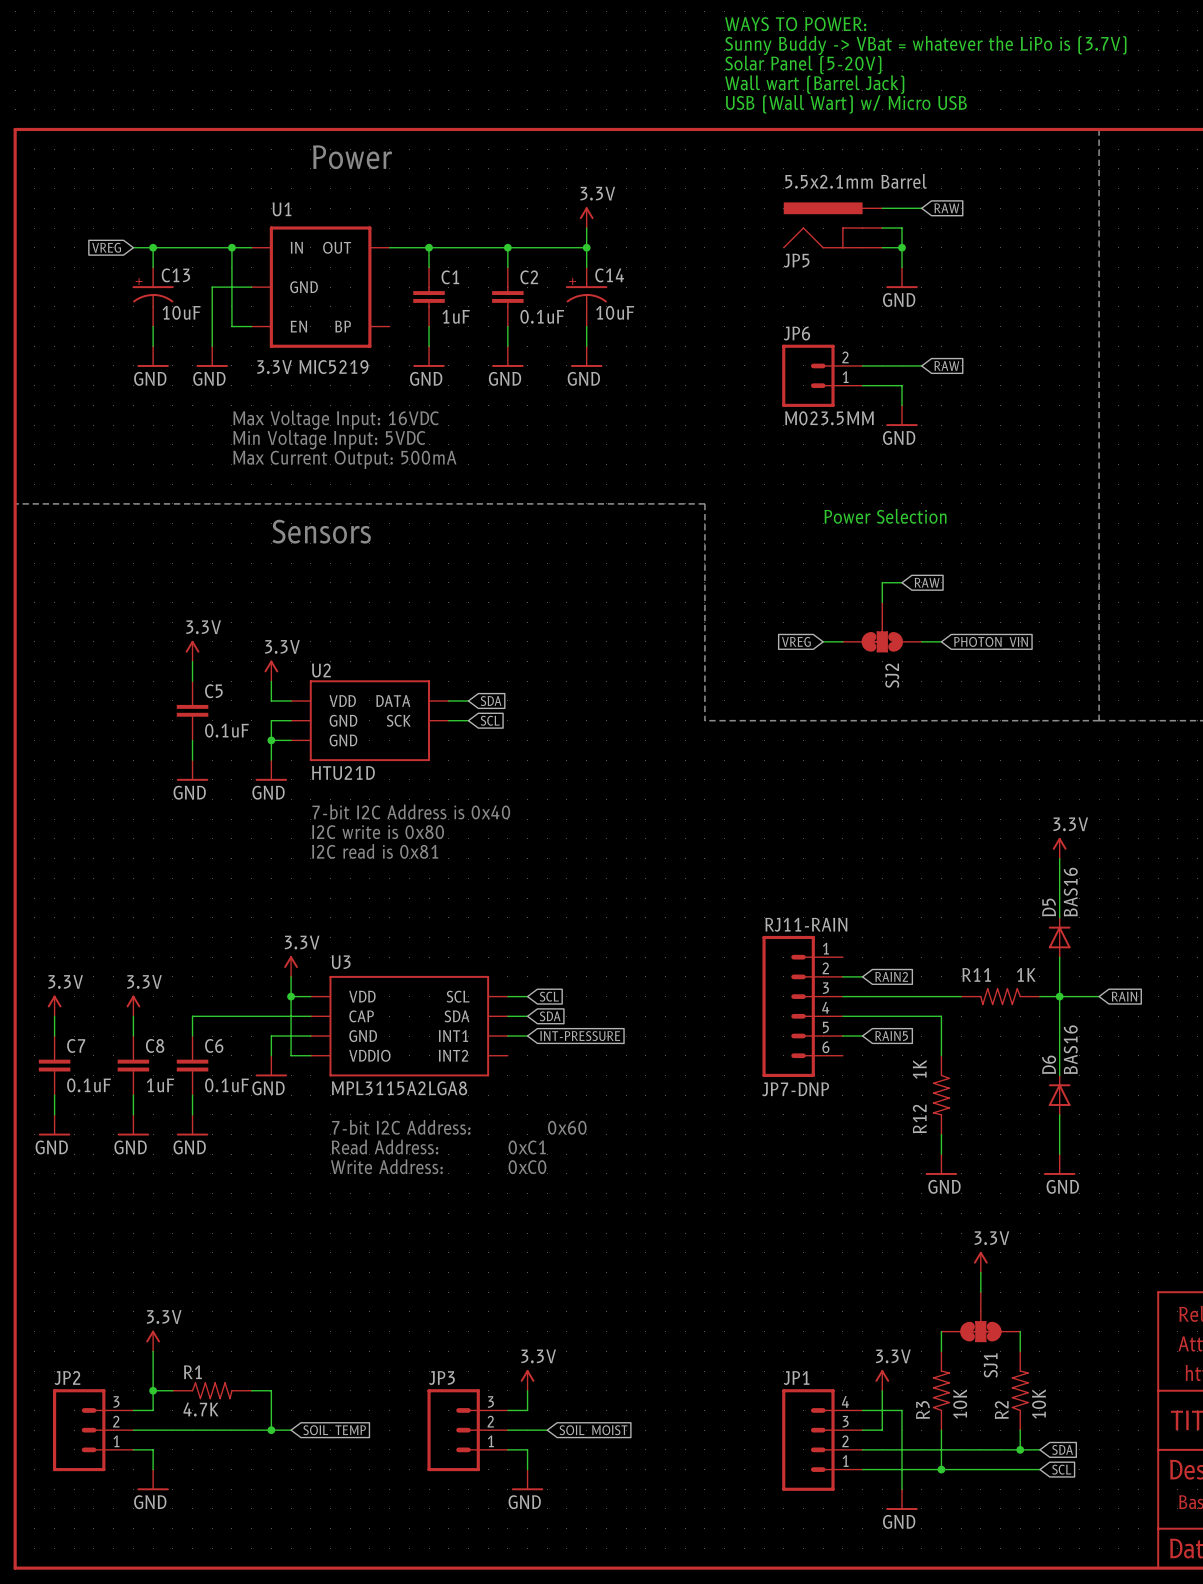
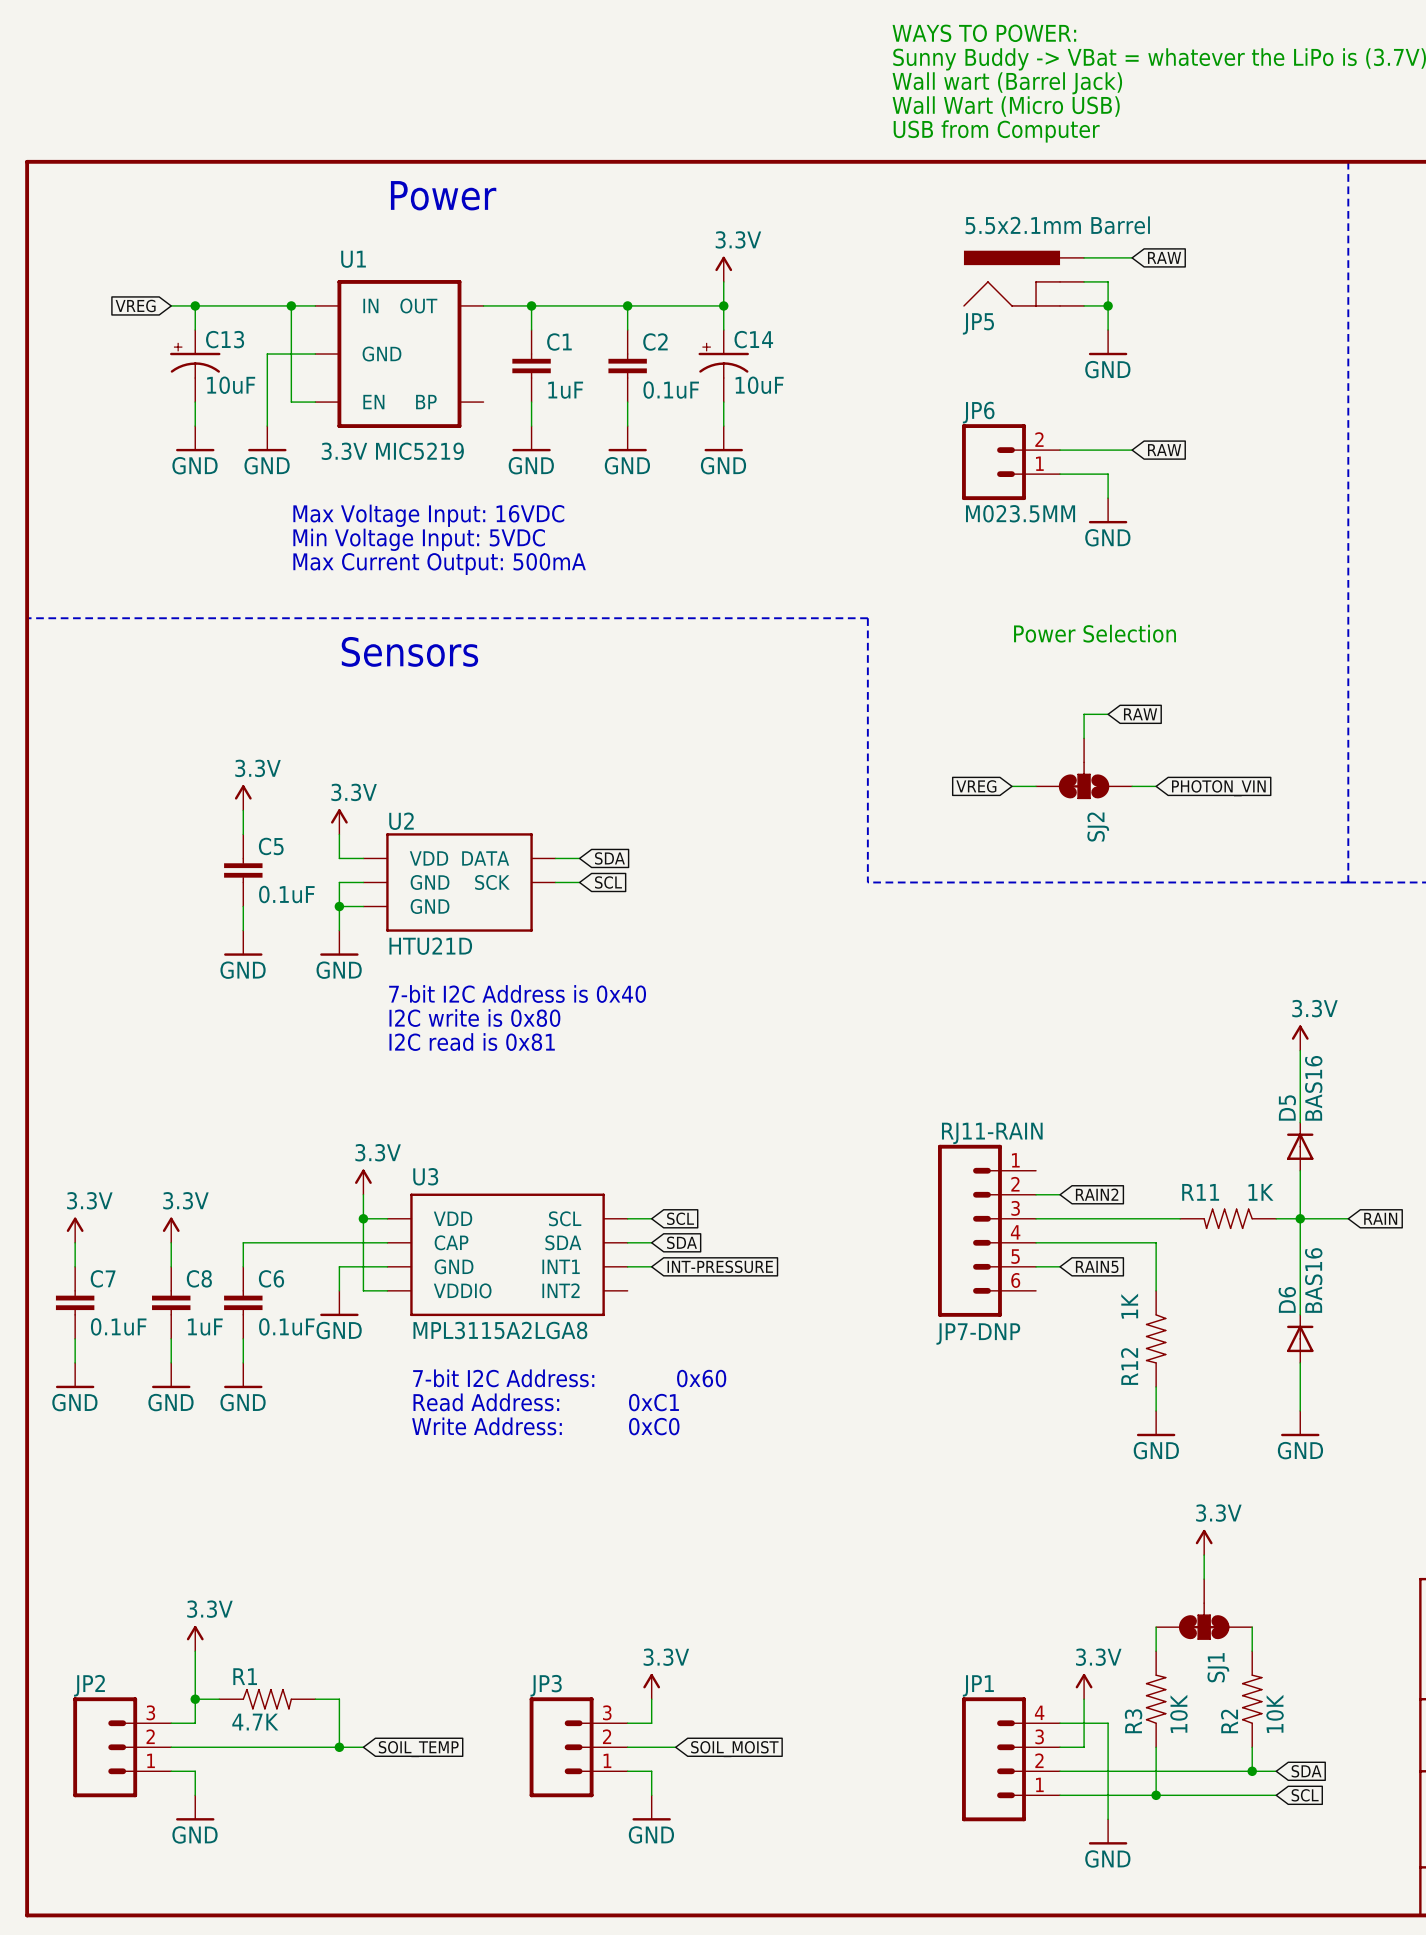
text: Solar Panel (5-20V) (803, 64) -> Wall wart (Barrel Jack) (1007, 83)
text: Wall wart (Barrel Jack) (814, 84) -> Wall Wart (Micro USB) (1006, 106)
text: USB (Wall Wart) w/ Micro USB (846, 104) -> USB from Computer (996, 131)

